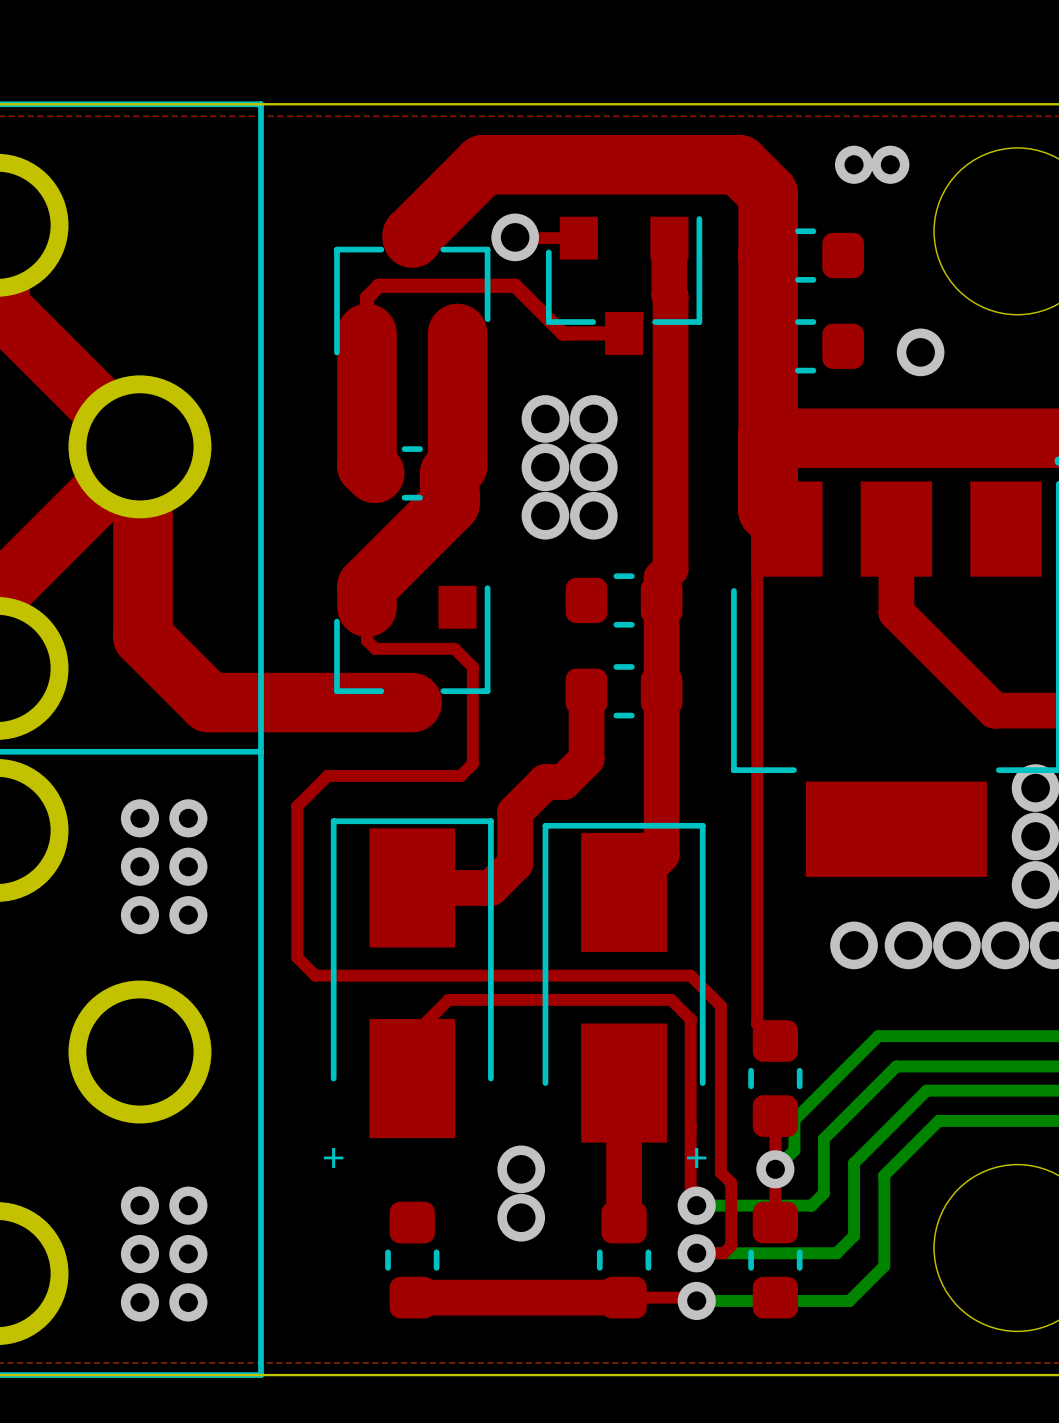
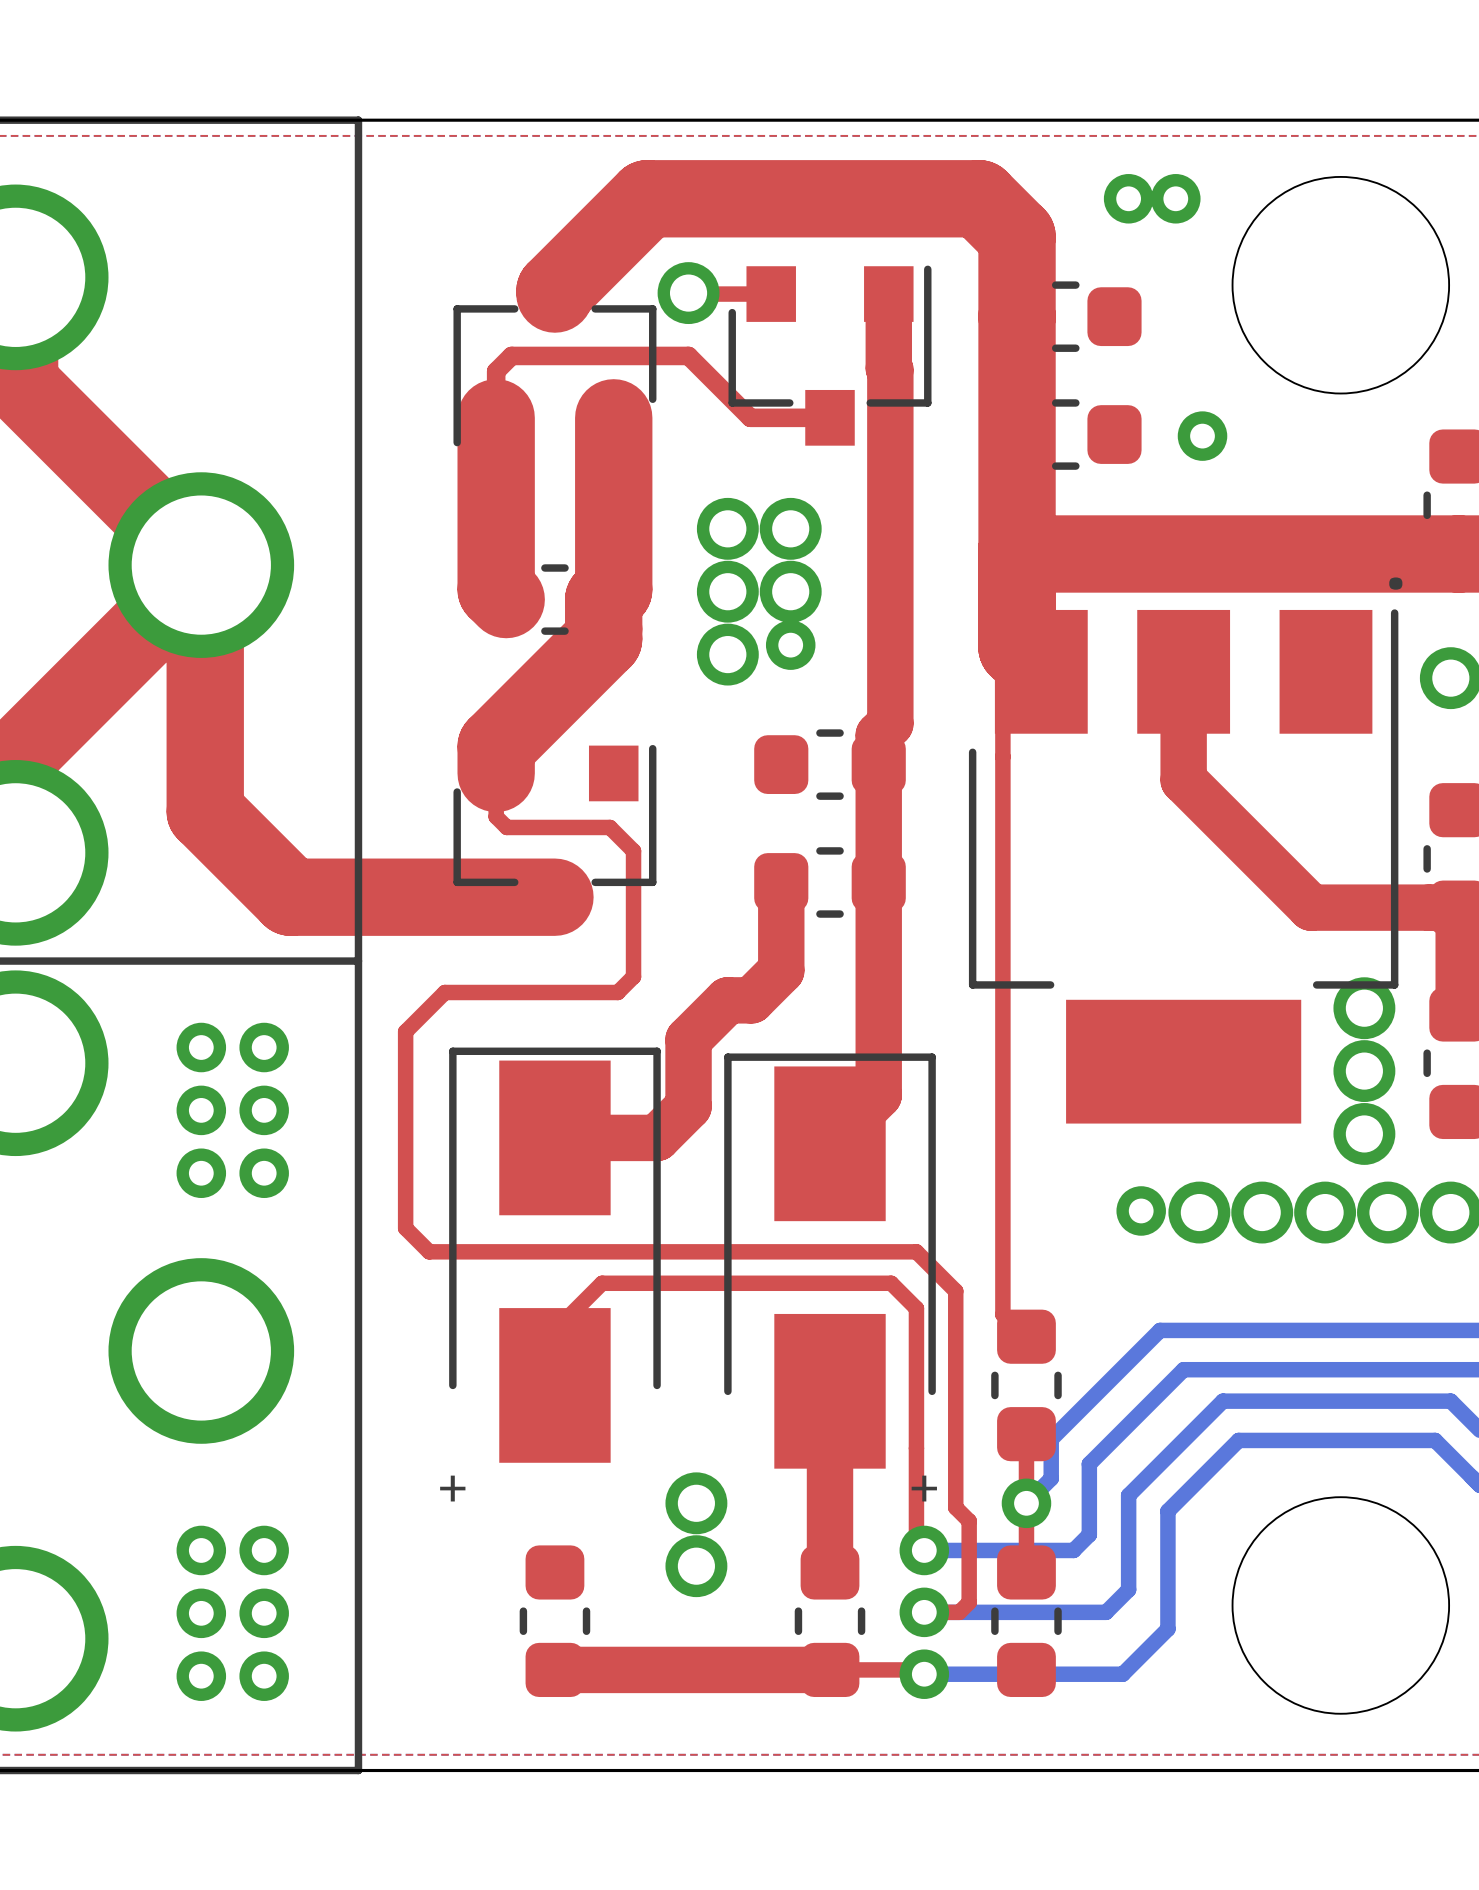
via size: [896, 328, 945, 377] -> [1177, 411, 1228, 461]
via size: [570, 491, 618, 540] -> [765, 620, 816, 670]
via size: [830, 921, 878, 970] -> [1116, 1186, 1166, 1236]

